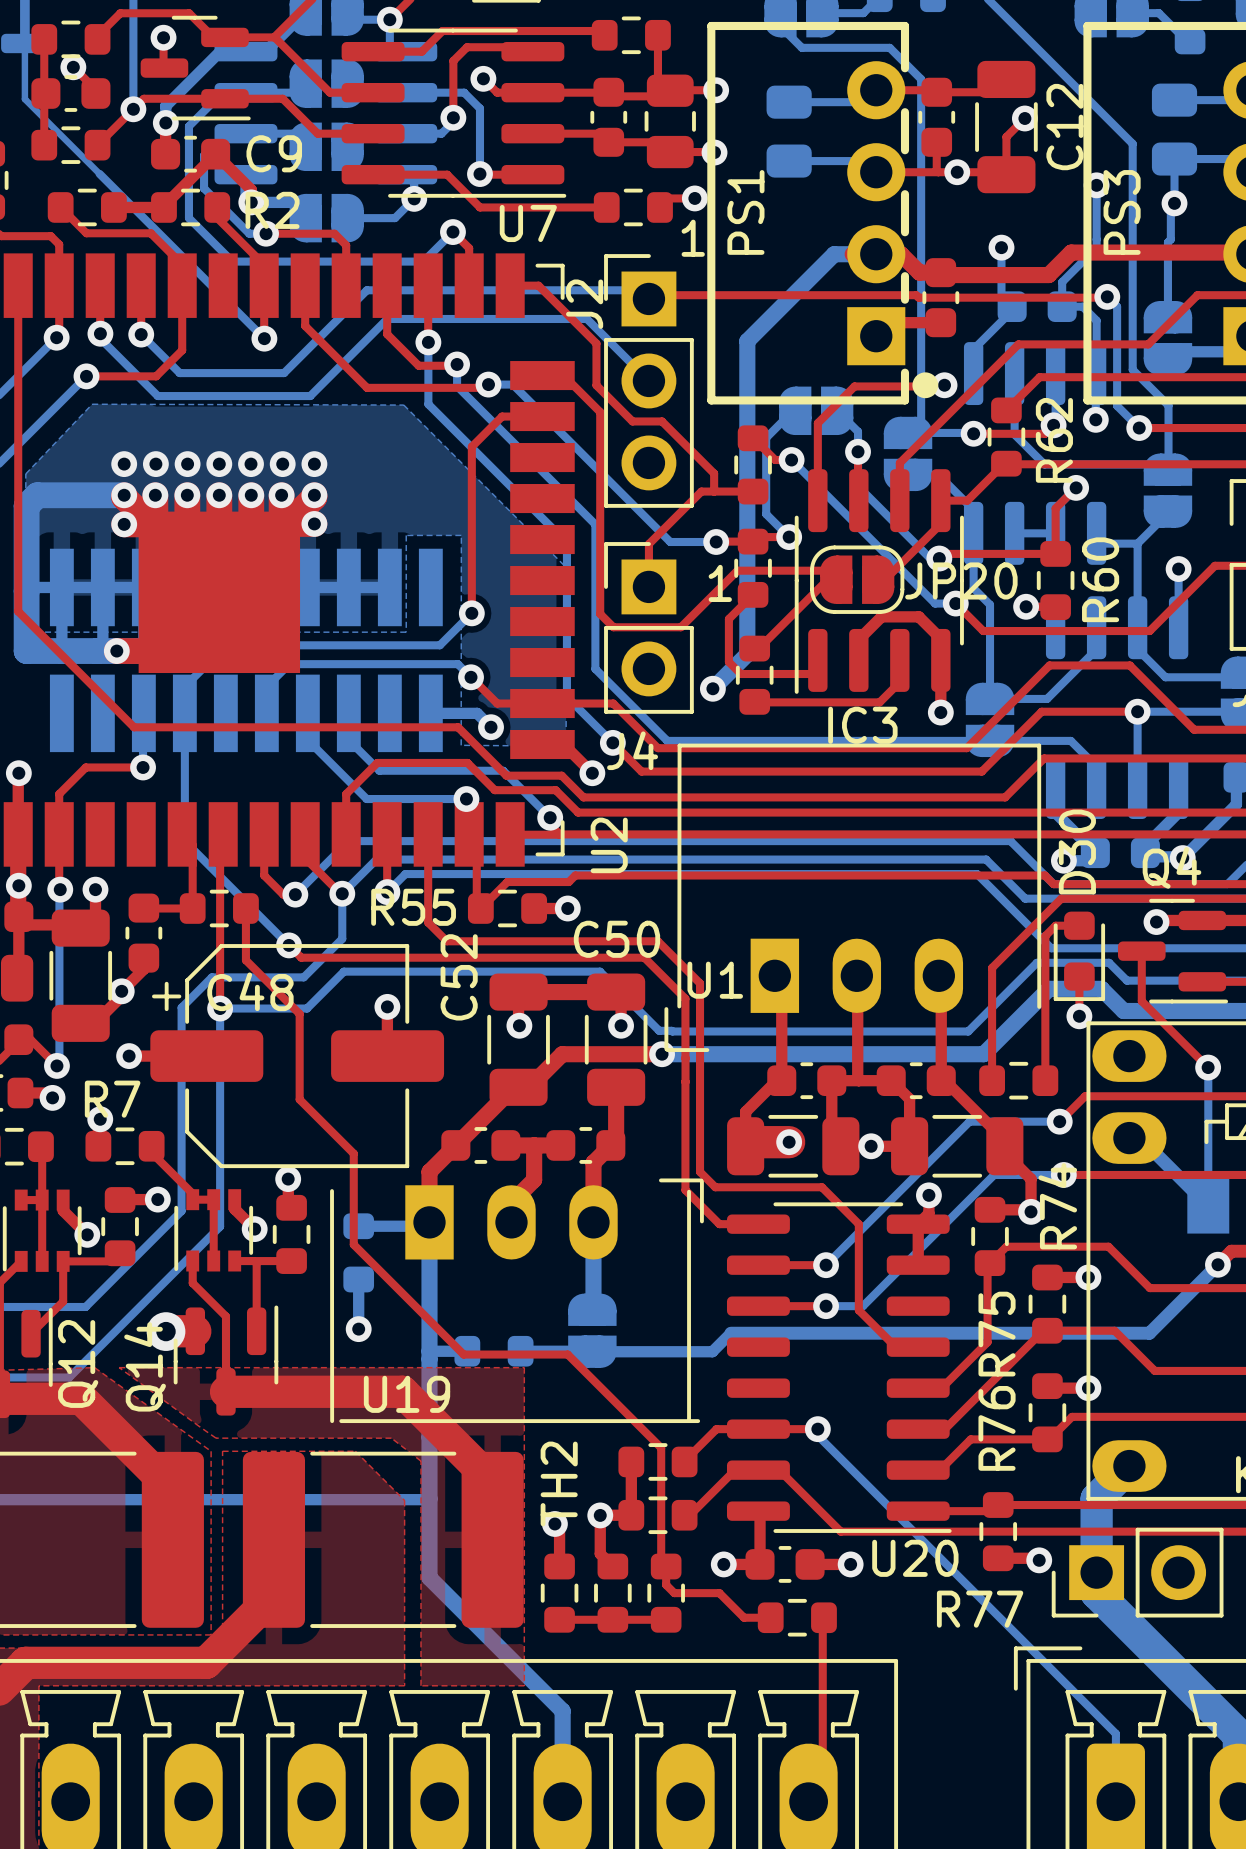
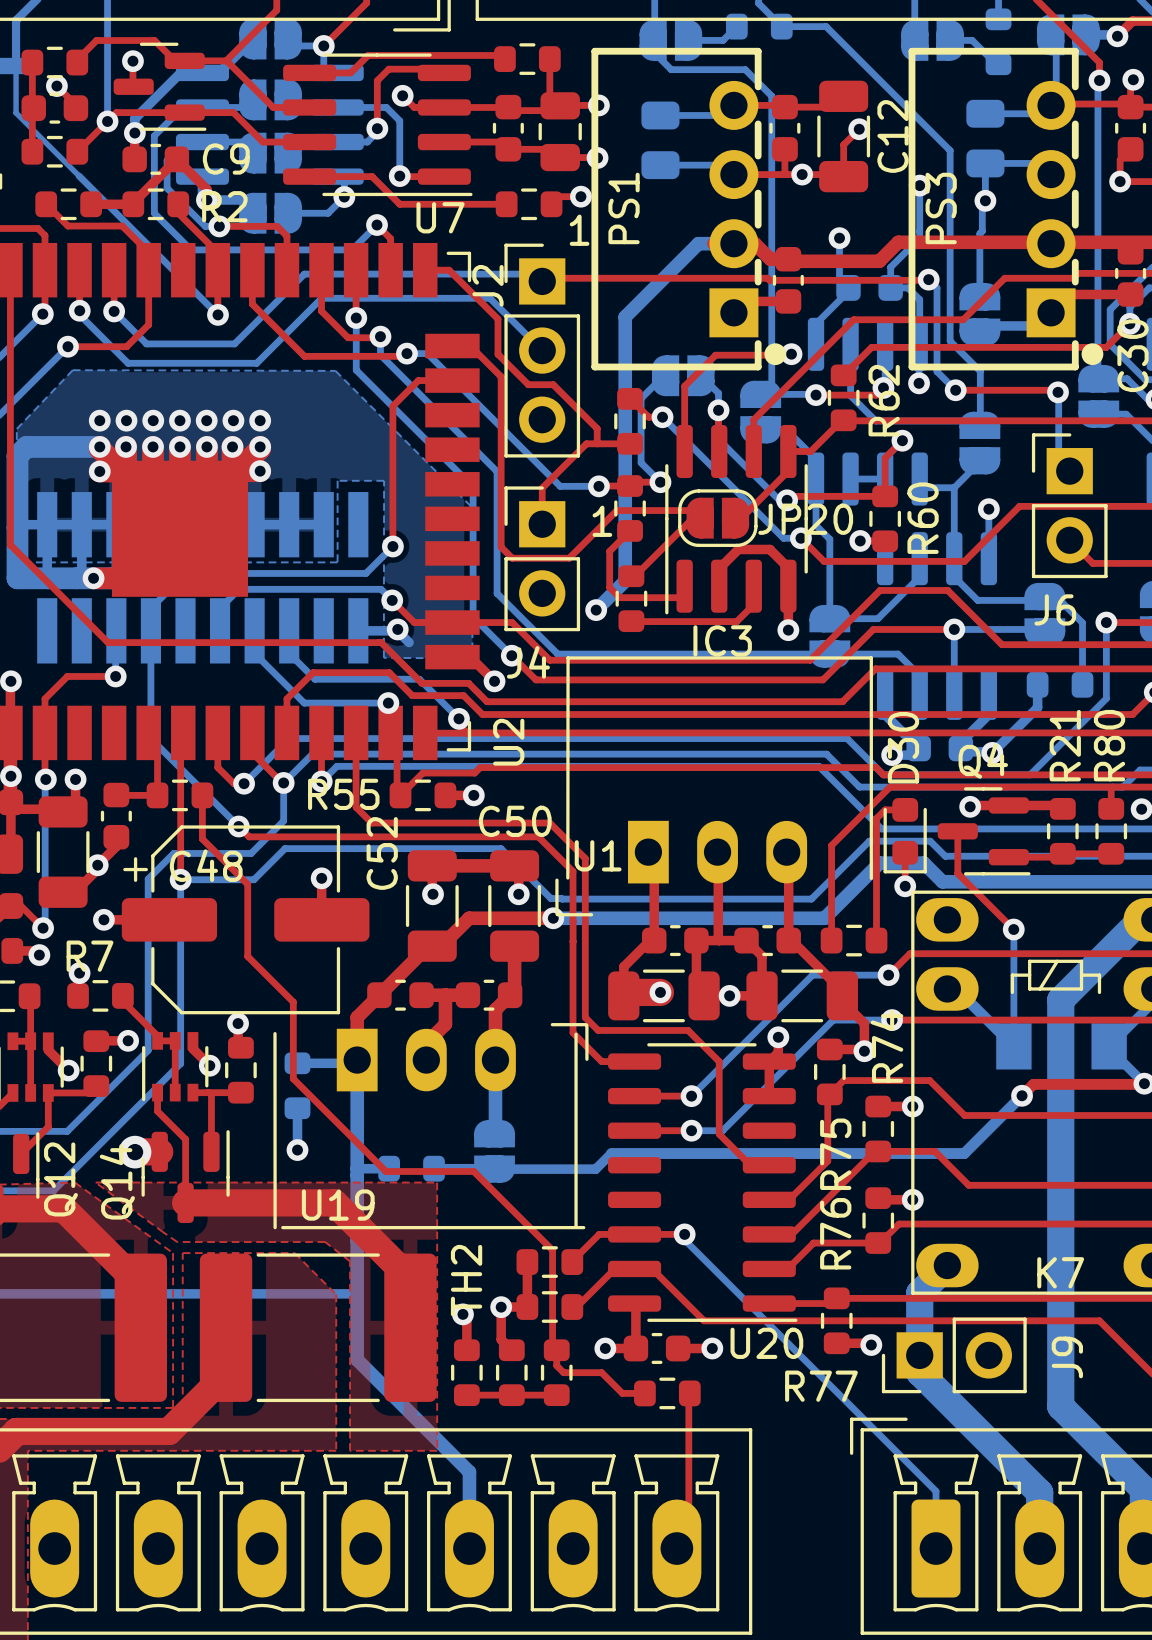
via position: (491, 727) -> (397, 629)

